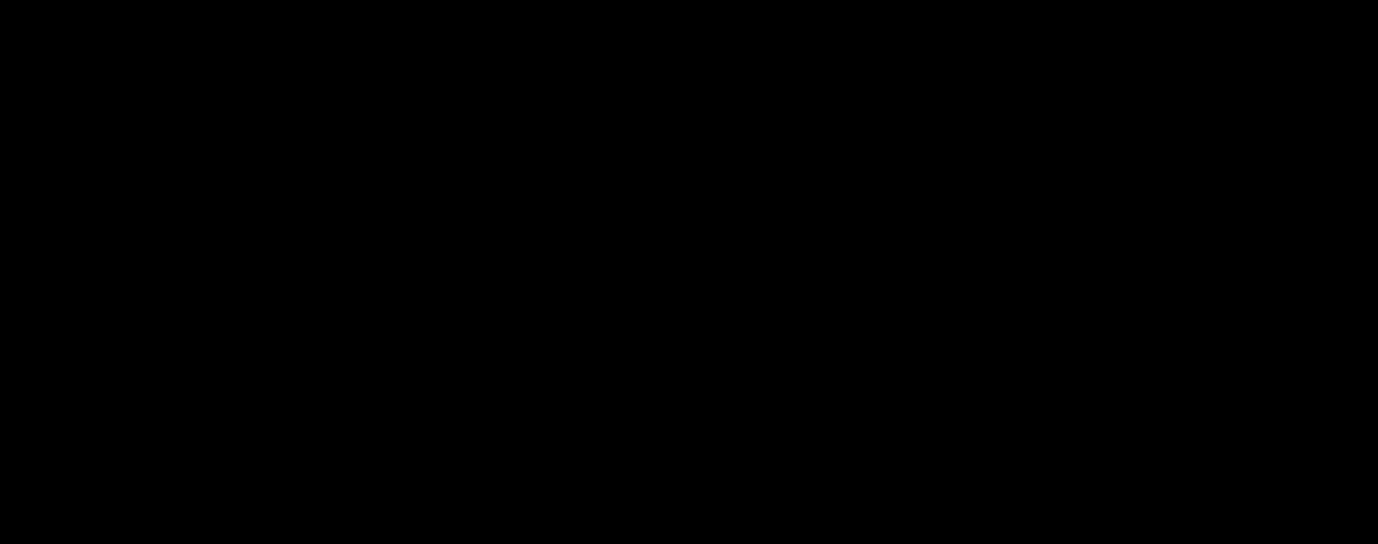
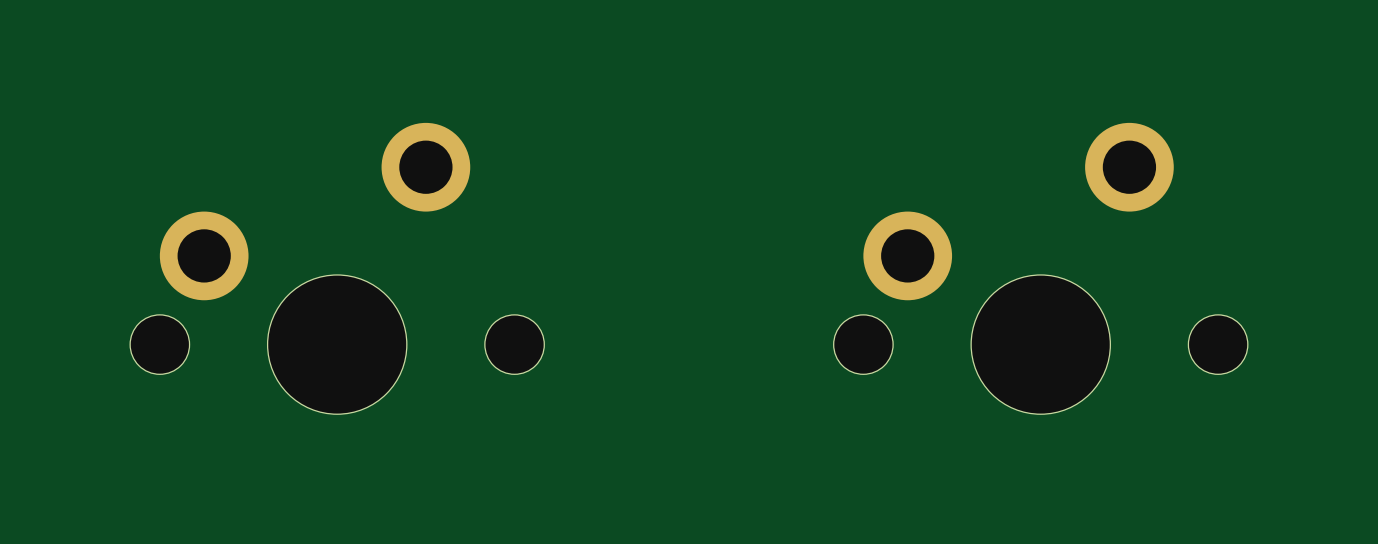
part: none -> (337, 268)
part: none -> (1040, 268)

